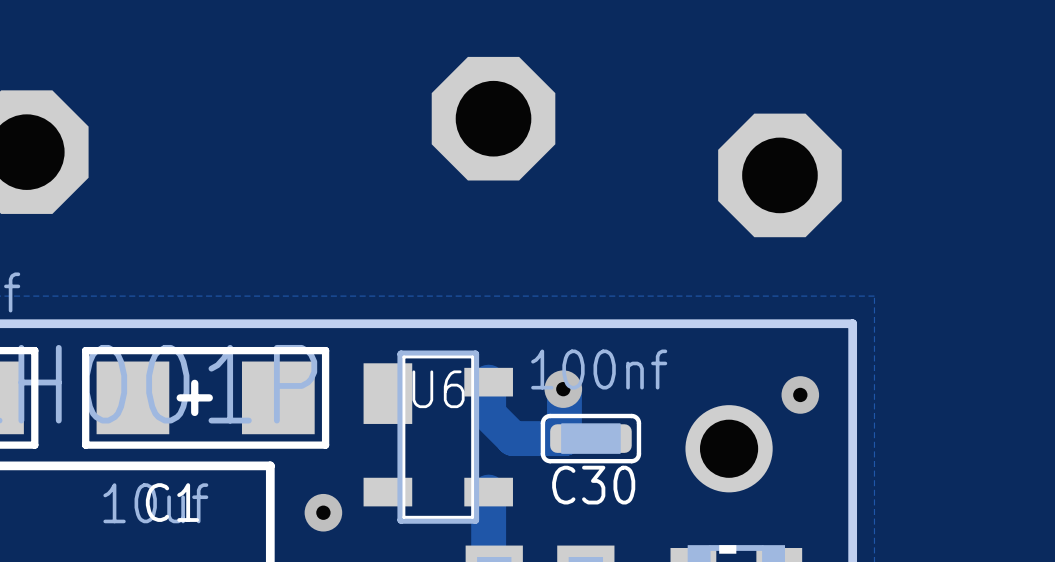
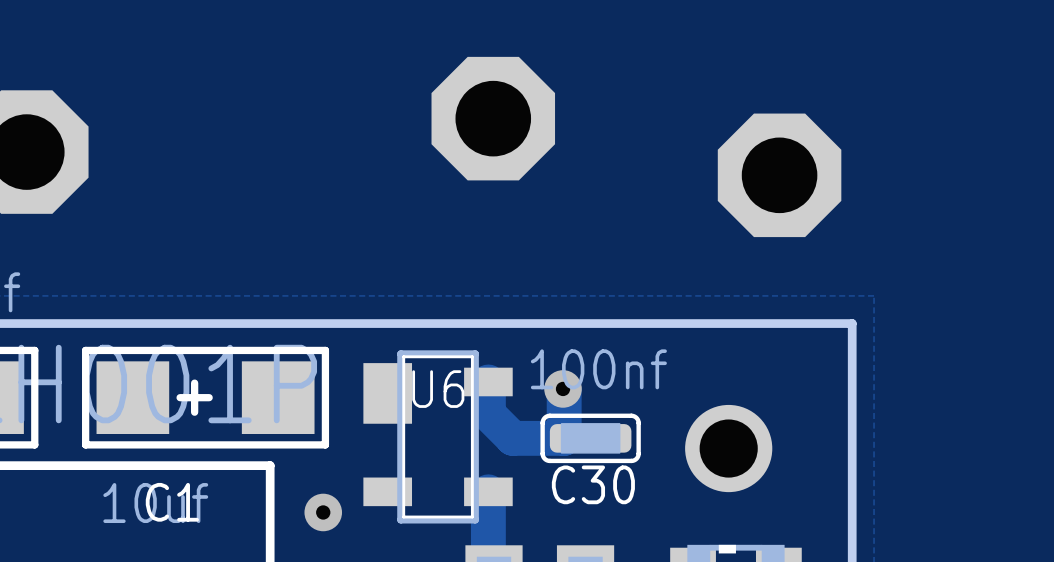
via: (800, 394) -> none

